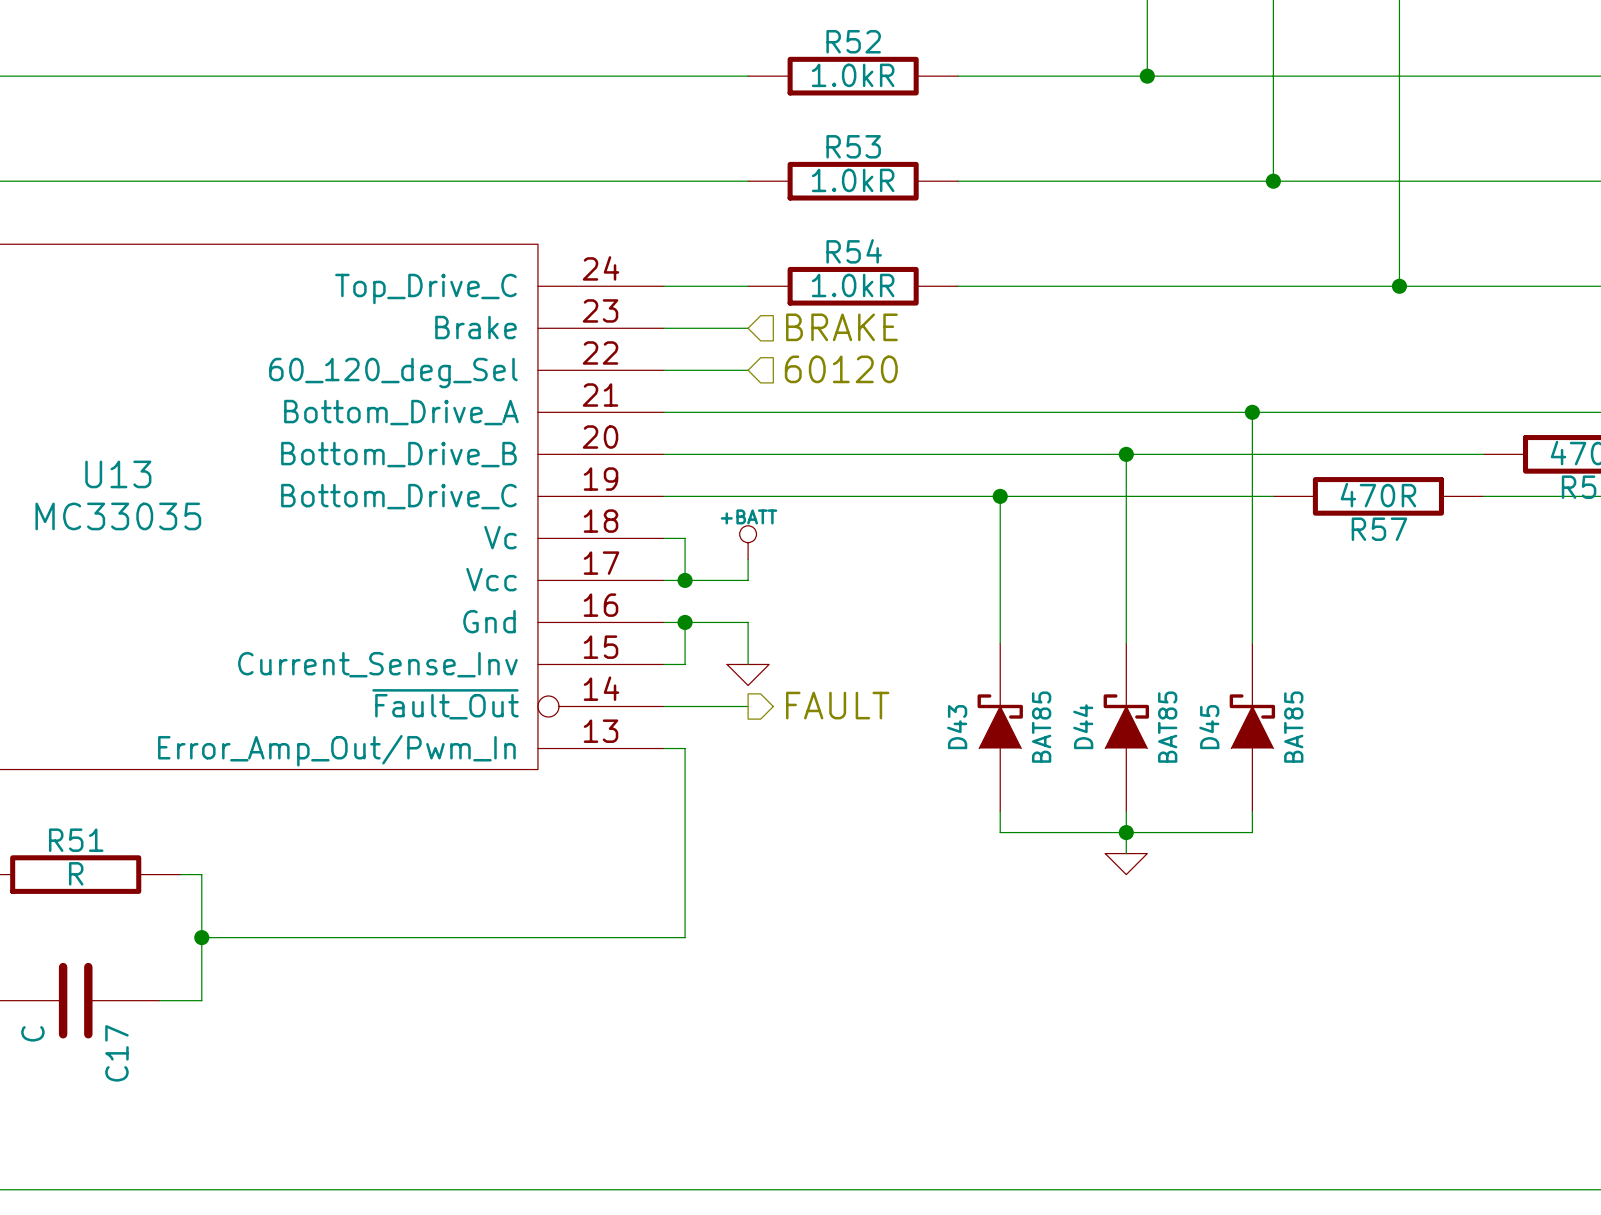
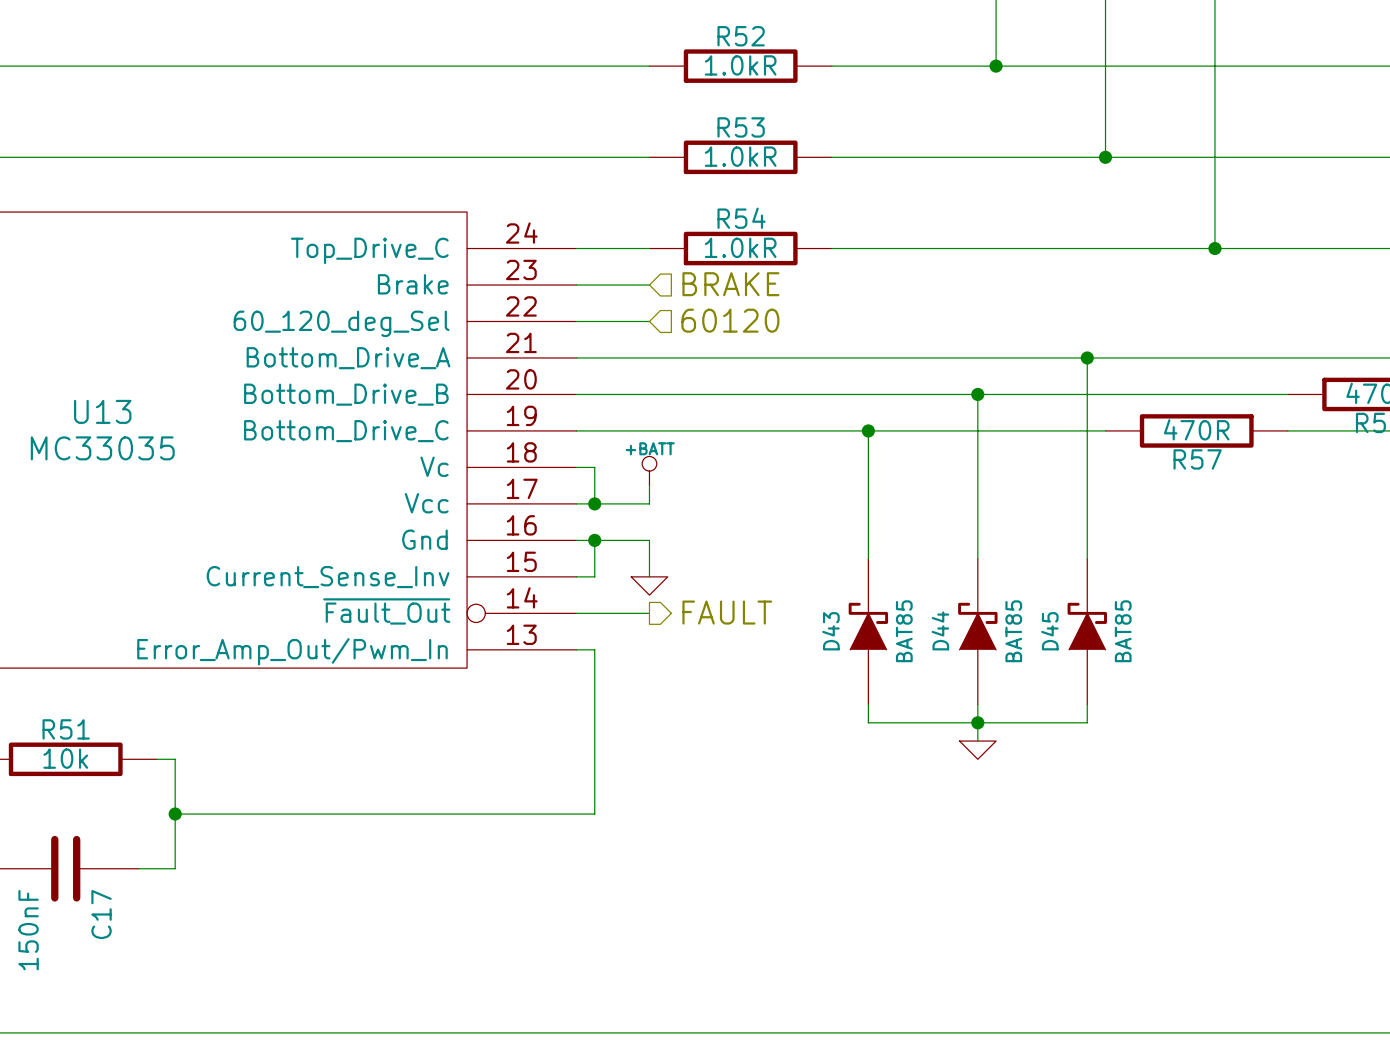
R51 value: R (76, 873) -> 10k (65, 758)
C17 value: C (32, 1033) -> 150nF (28, 930)

